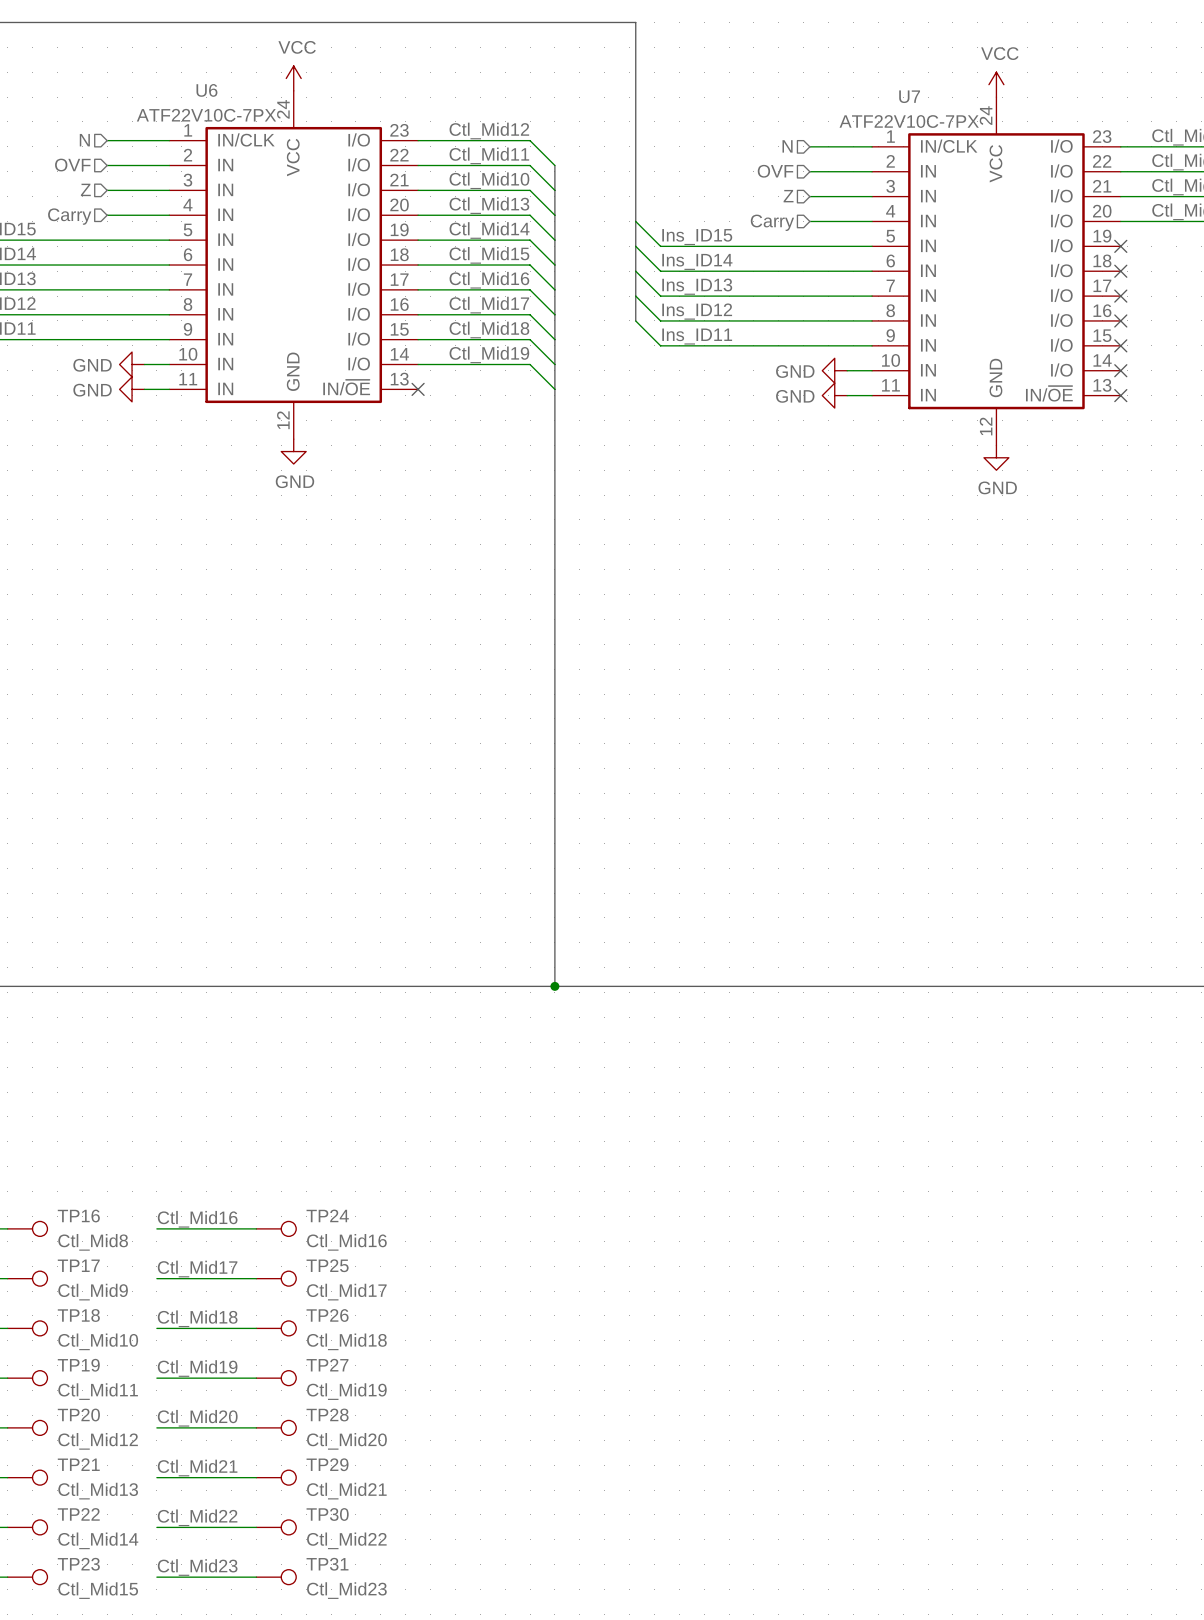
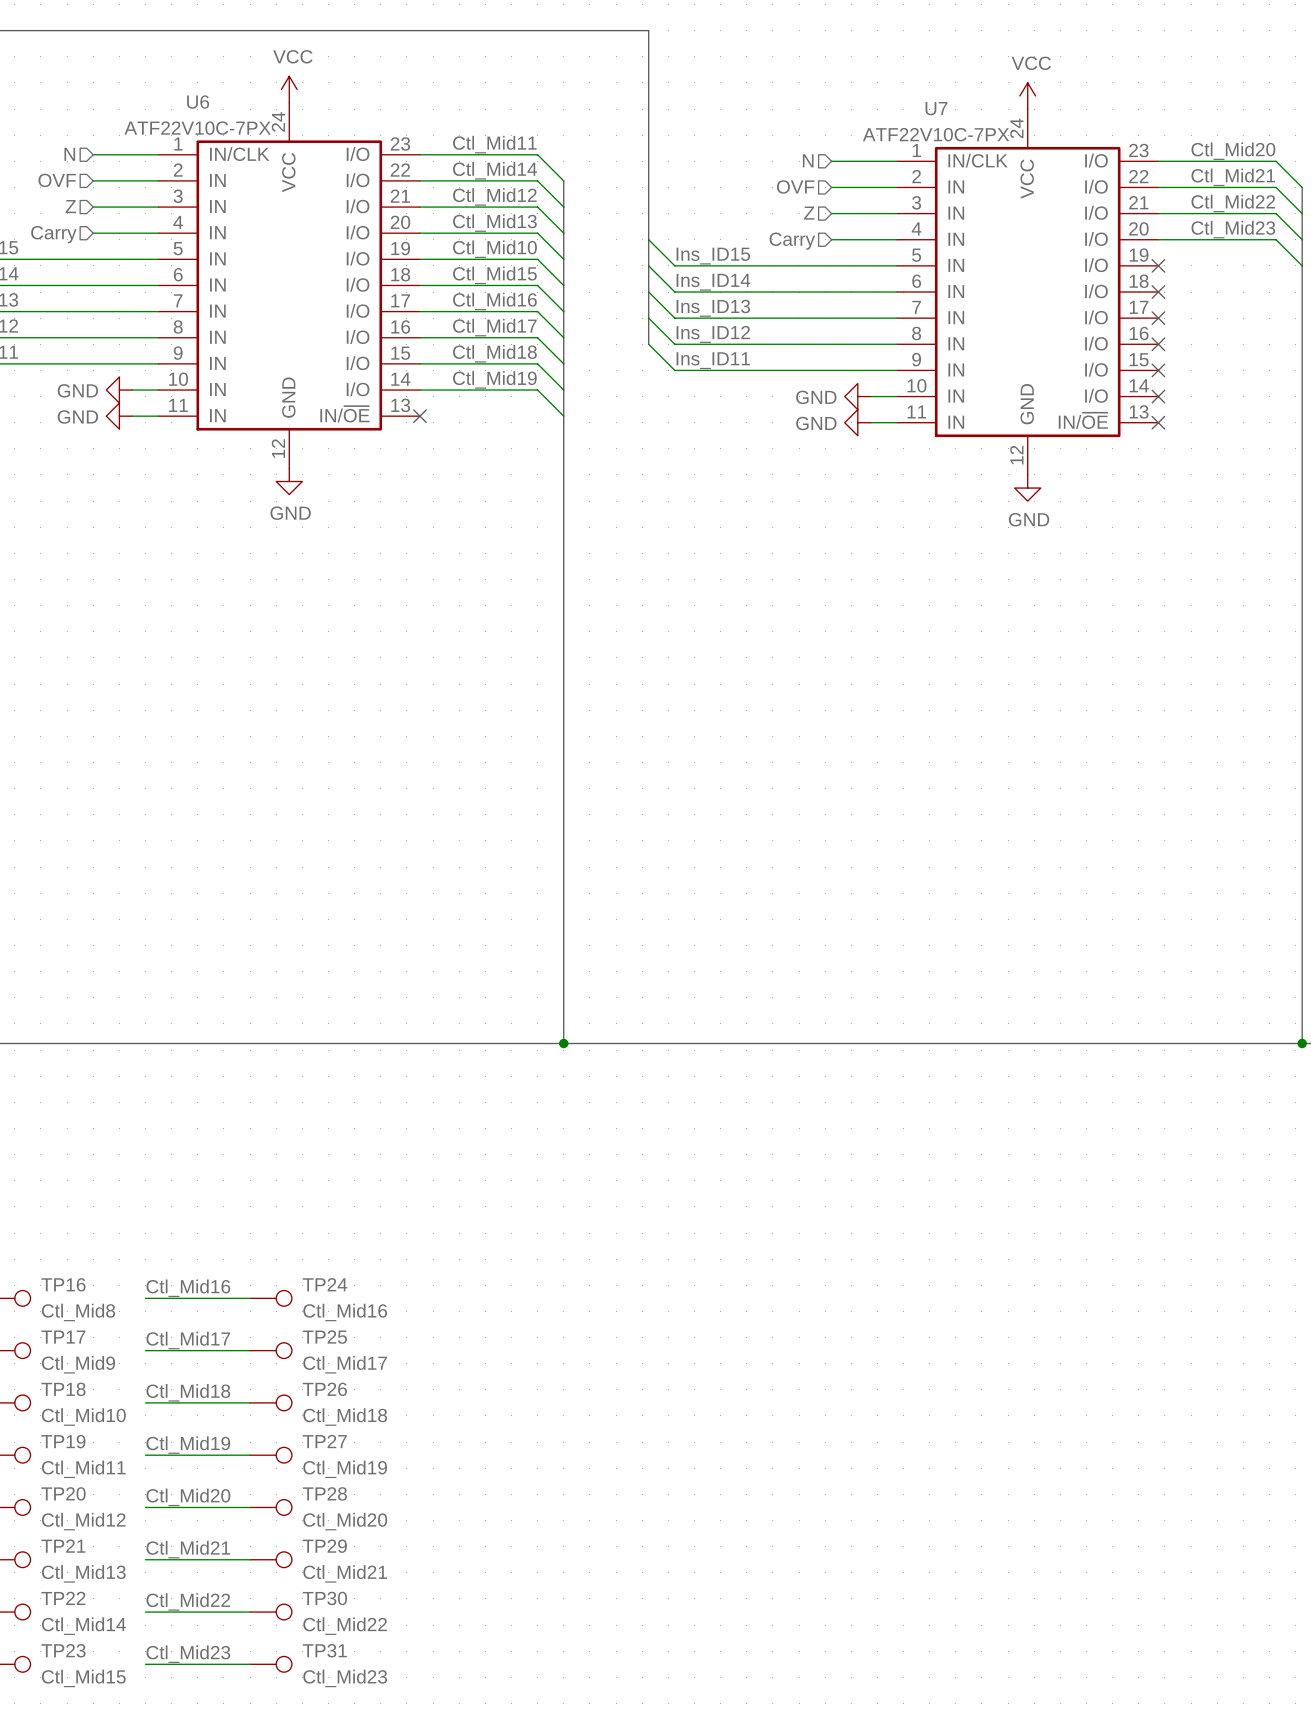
label: Ctl_Mid12 (489, 131) -> Ctl_Mid11 (494, 144)
label: Ctl_Mid11 (489, 155) -> Ctl_Mid14 (495, 170)
label: Ctl_Mid10 (489, 180) -> Ctl_Mid12 (494, 196)
label: Ctl_Mid14 (489, 230) -> Ctl_Mid10 (494, 249)

